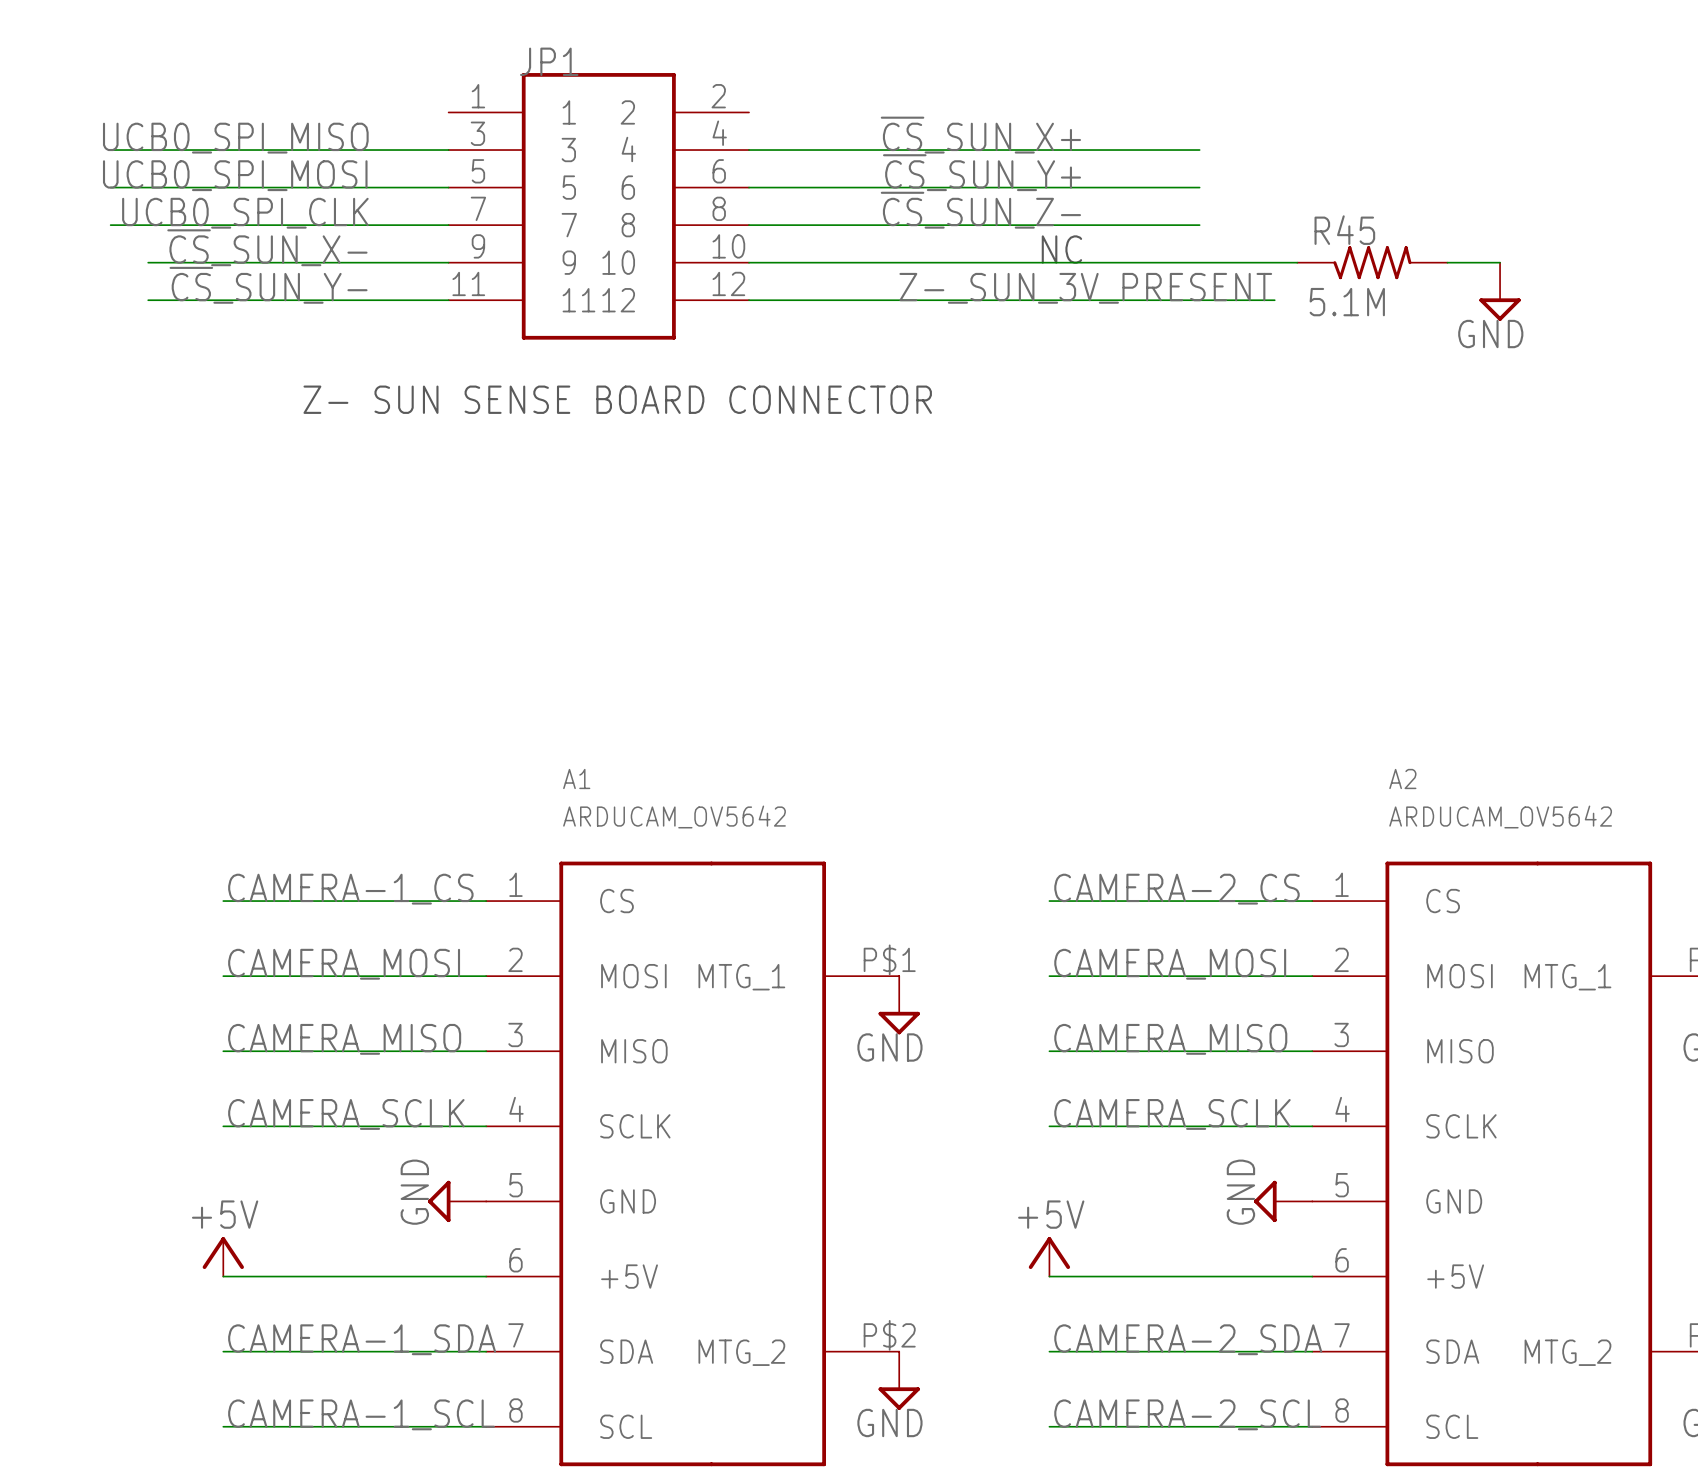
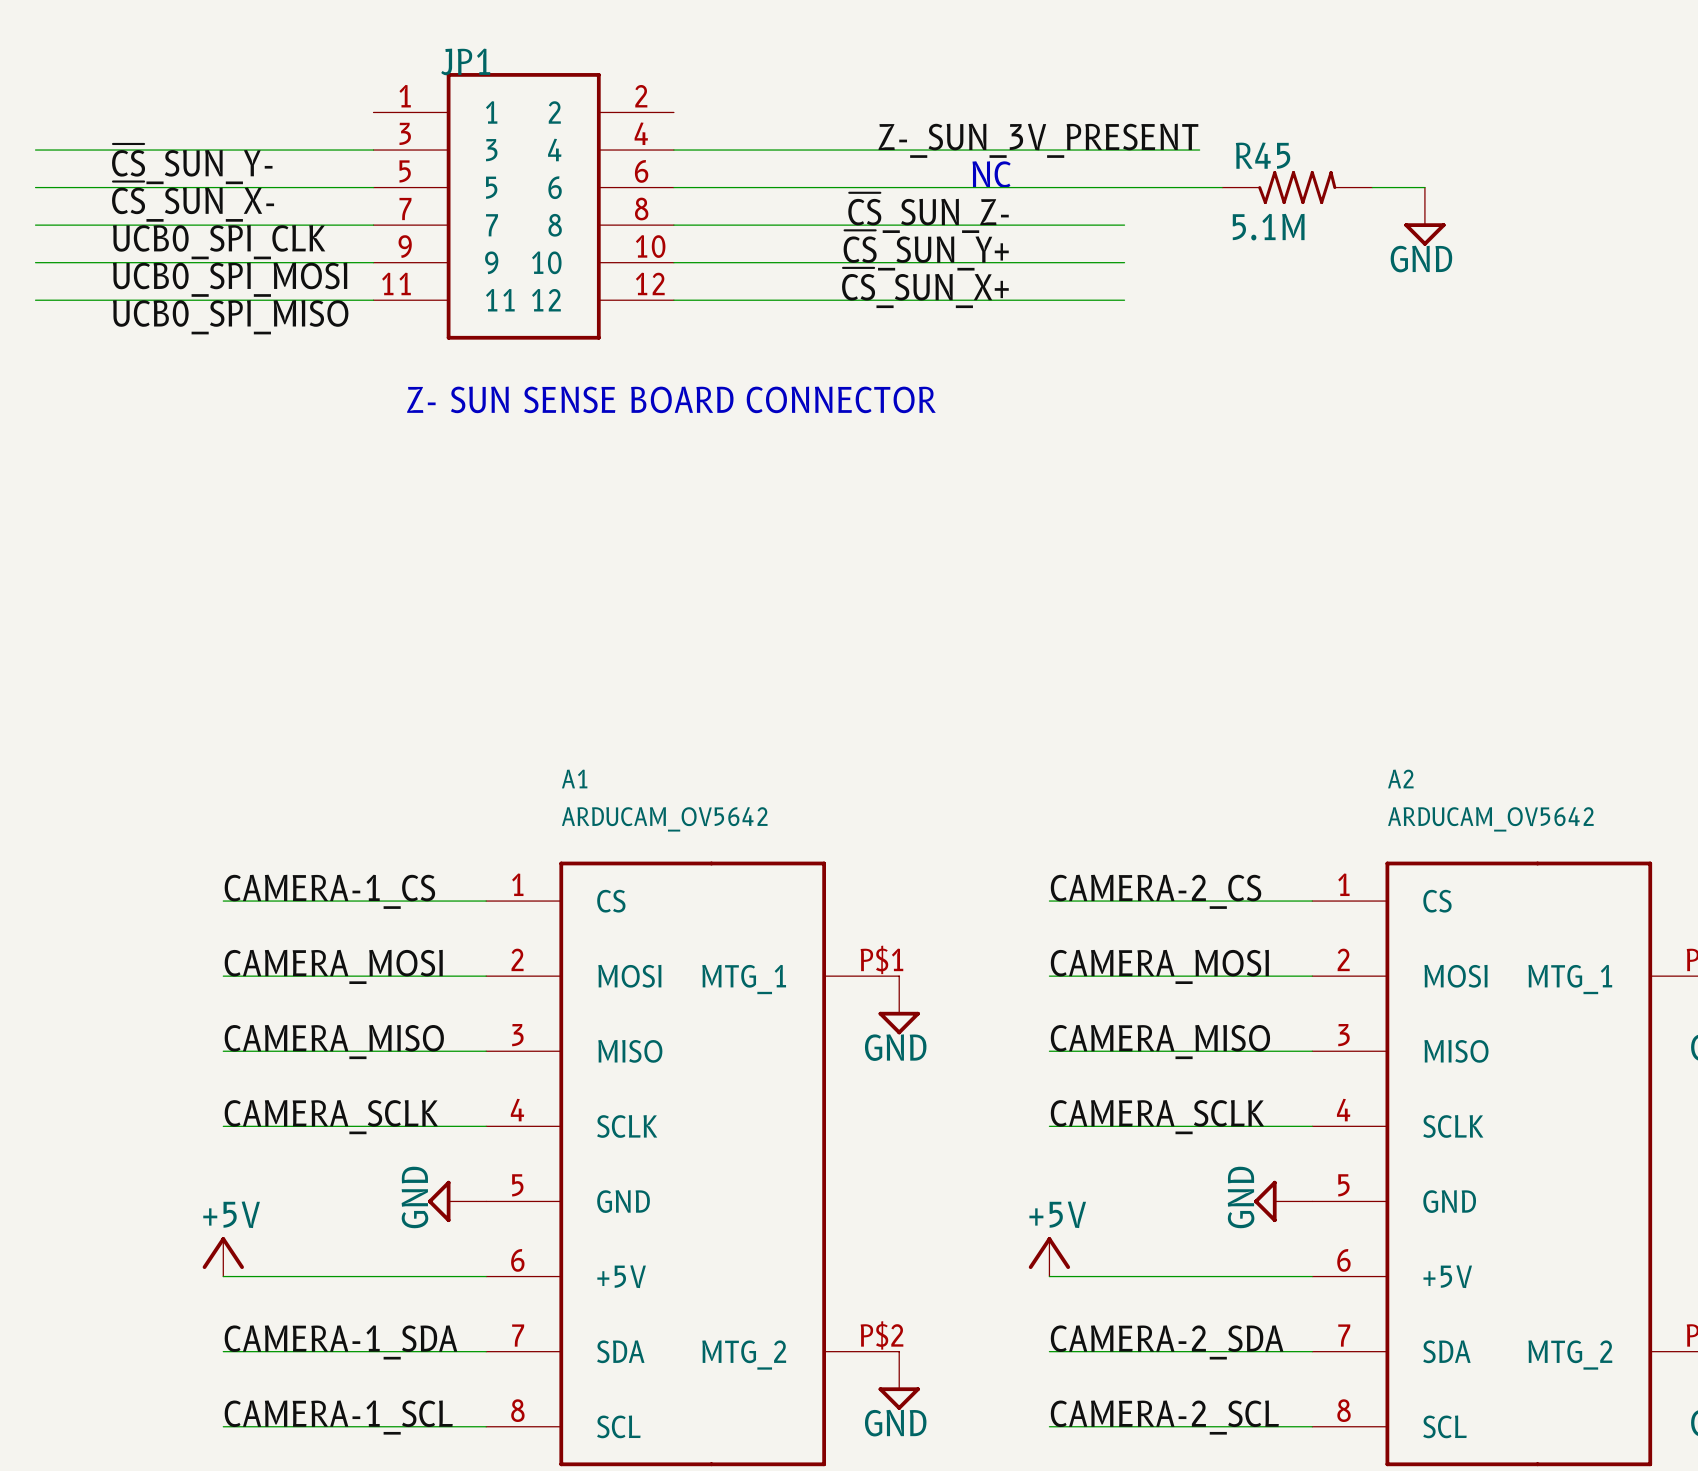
label position: ~{CS}_SUN_X+ (980, 135) -> ~{CS}_SUN_X+ (925, 287)
label position: UCB0_SPI_MISO (235, 138) -> UCB0_SPI_MISO (230, 317)
wire: none -> (35, 150) (110, 150)
label position: ~{CS}_SUN_Y+ (982, 172) -> ~{CS}_SUN_Y+ (926, 250)
label position: UCB0_SPI_MOSI (235, 175) -> UCB0_SPI_MOSI (230, 279)
wire: none -> (35, 187) (110, 187)
wire: none -> (1199, 187) (1222, 187)
JP1 position: (598, 206) -> (523, 206)
label position: ~{CS}_SUN_Z- (980, 210) -> ~{CS}_SUN_Z- (928, 212)
label position: UCB0_SPI_CLK (245, 213) -> UCB0_SPI_CLK (219, 242)
wire: none -> (35, 225) (110, 225)
wire: (1124, 225) (1199, 225) -> none
label position: ~{CS}_SUN_X- (267, 247) -> ~{CS}_SUN_X- (193, 201)
text position: NC (1061, 249) -> NC (991, 174)
wire: none -> (35, 262) (148, 262)
wire: (1124, 262) (1297, 262) -> none
R45 position: (1372, 262) -> (1297, 187)
wire: (1447, 262) (1500, 262) -> (1372, 187) (1424, 187)
label position: ~{CS}_SUN_Y- (268, 285) -> ~{CS}_SUN_Y- (192, 164)
label position: Z-_SUN_3V_PRESENT (1085, 288) -> Z-_SUN_3V_PRESENT (1038, 140)
power symbol position: GND (1500, 291) -> GND (1424, 216)
wire: none -> (35, 300) (148, 300)
wire: (1124, 300) (1274, 300) -> none

